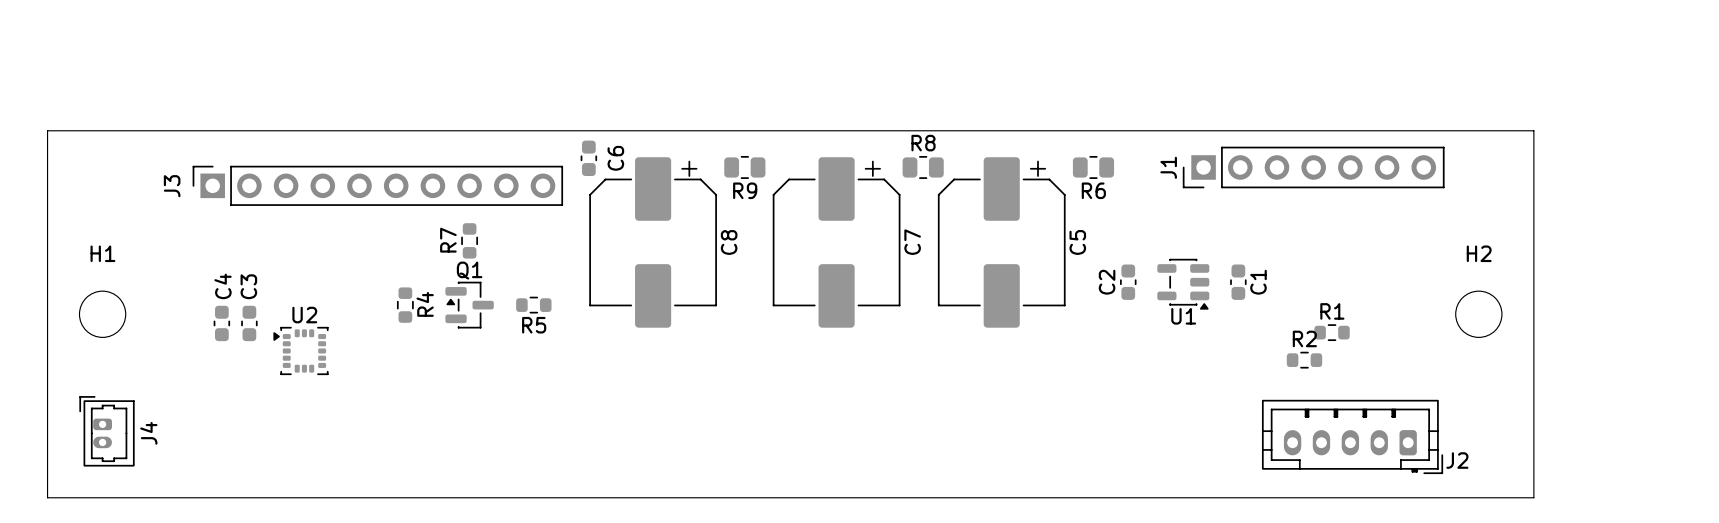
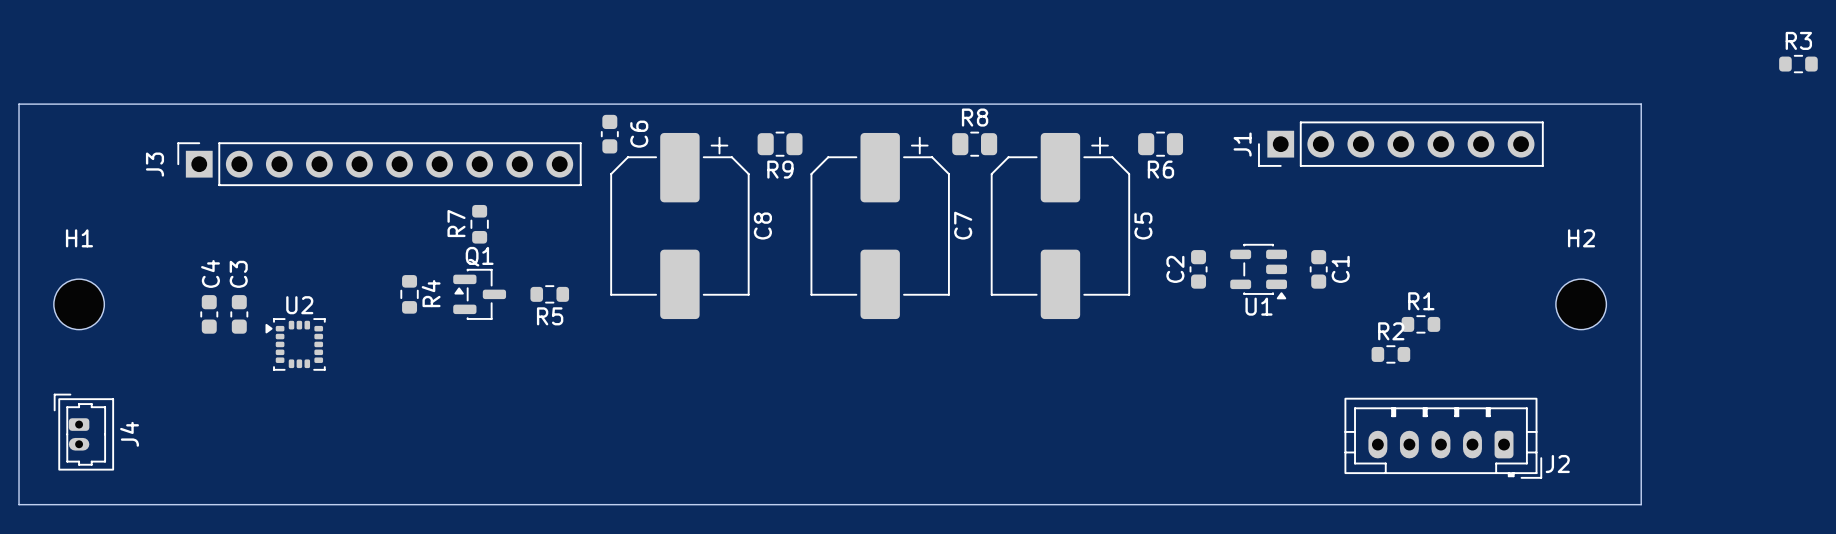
R3: none -> (1798, 64)

